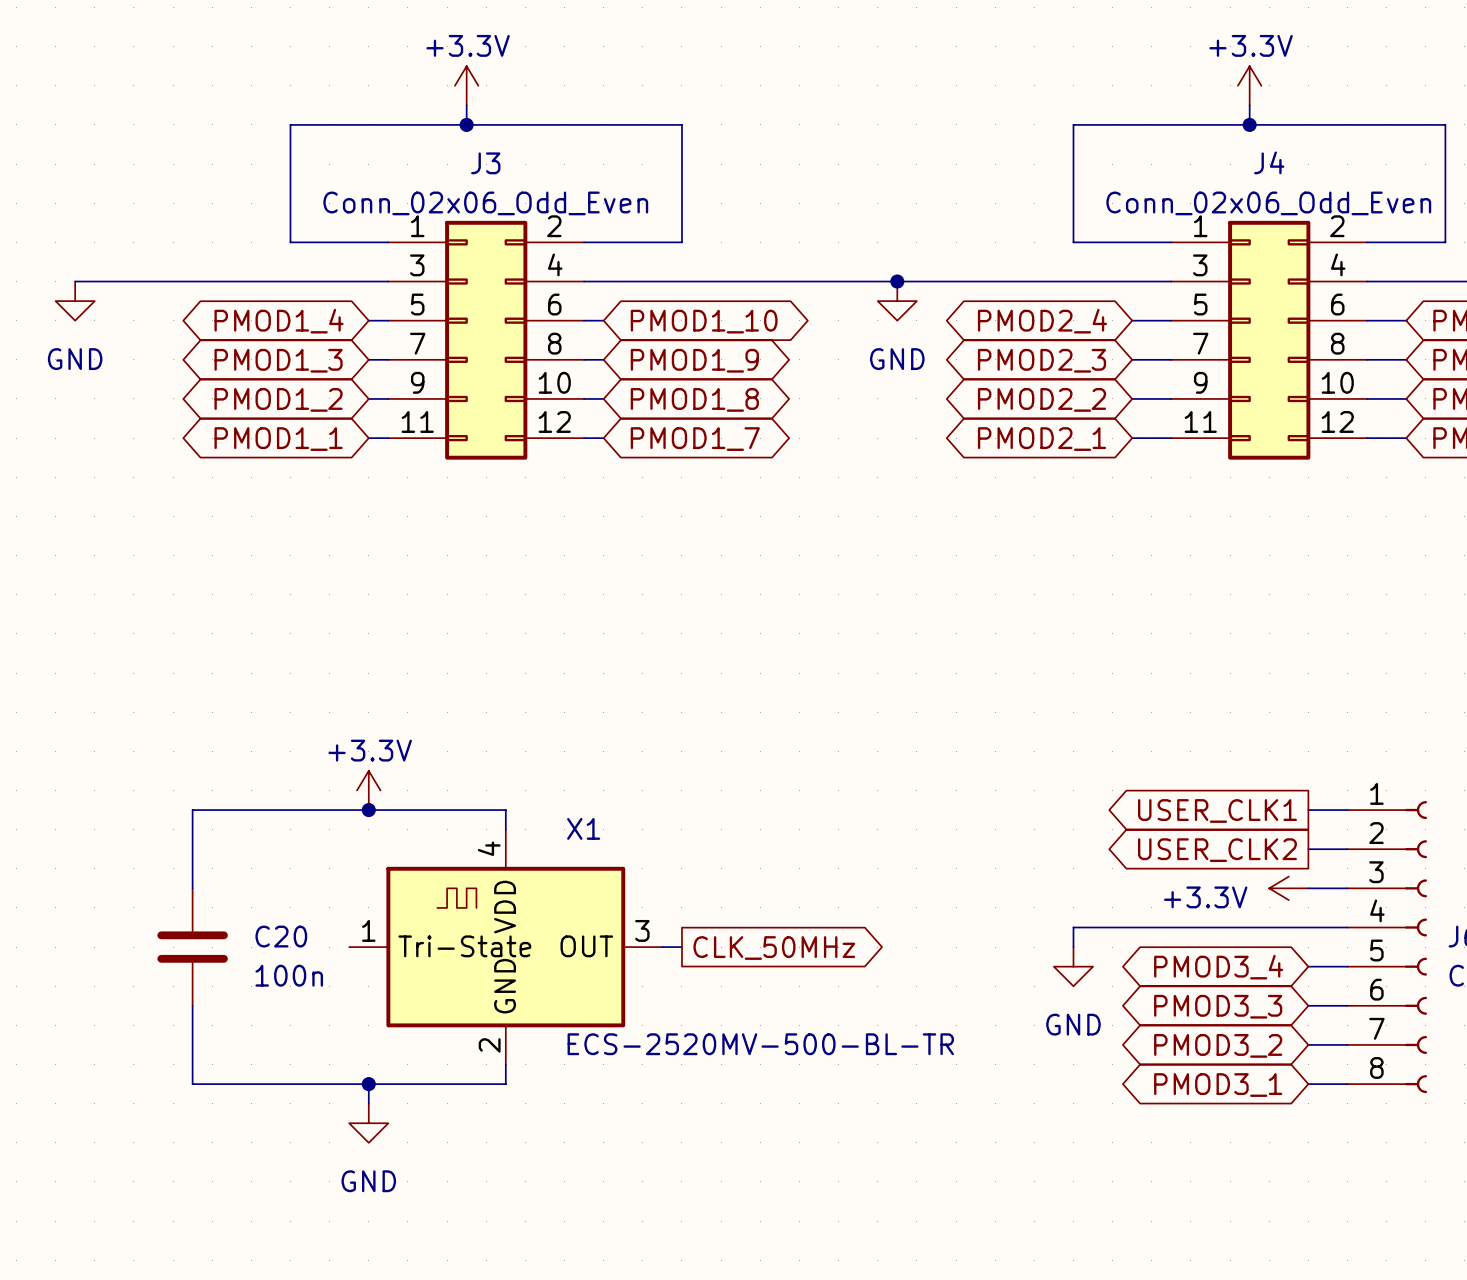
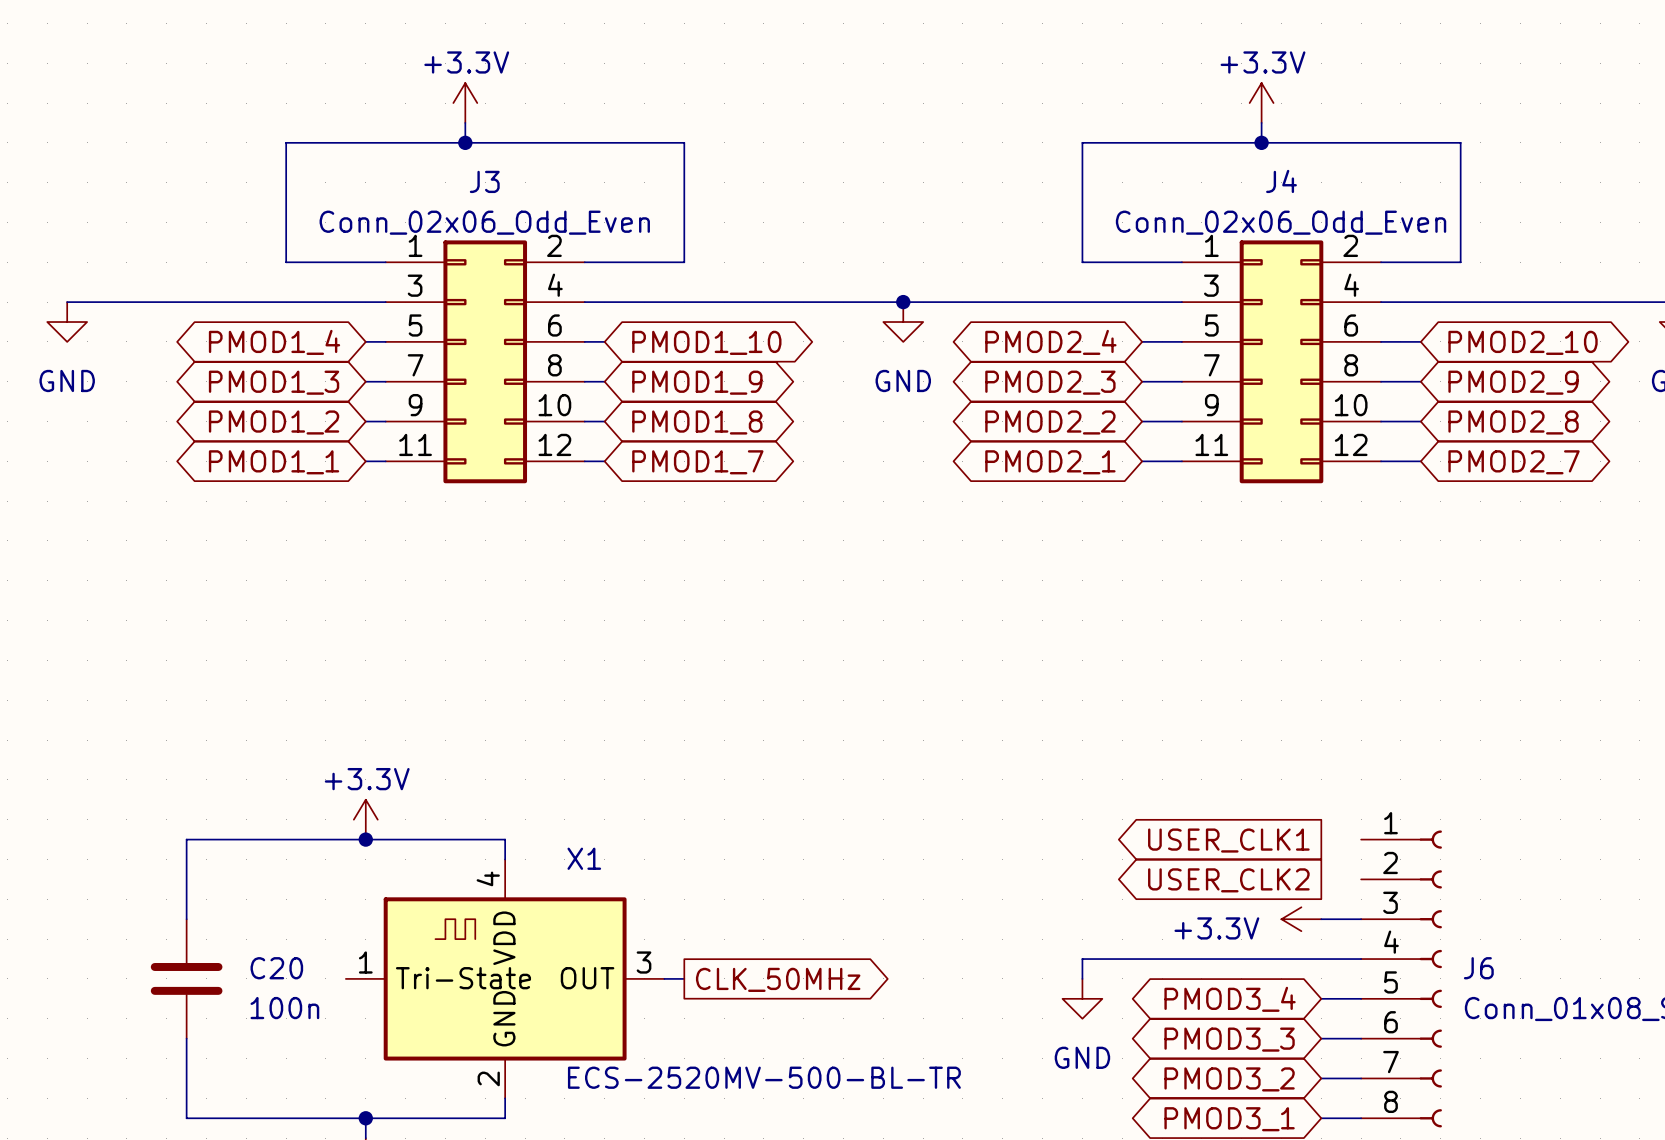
wire: (1308, 810) (1347, 810) -> none
wire: (1308, 849) (1347, 849) -> none

